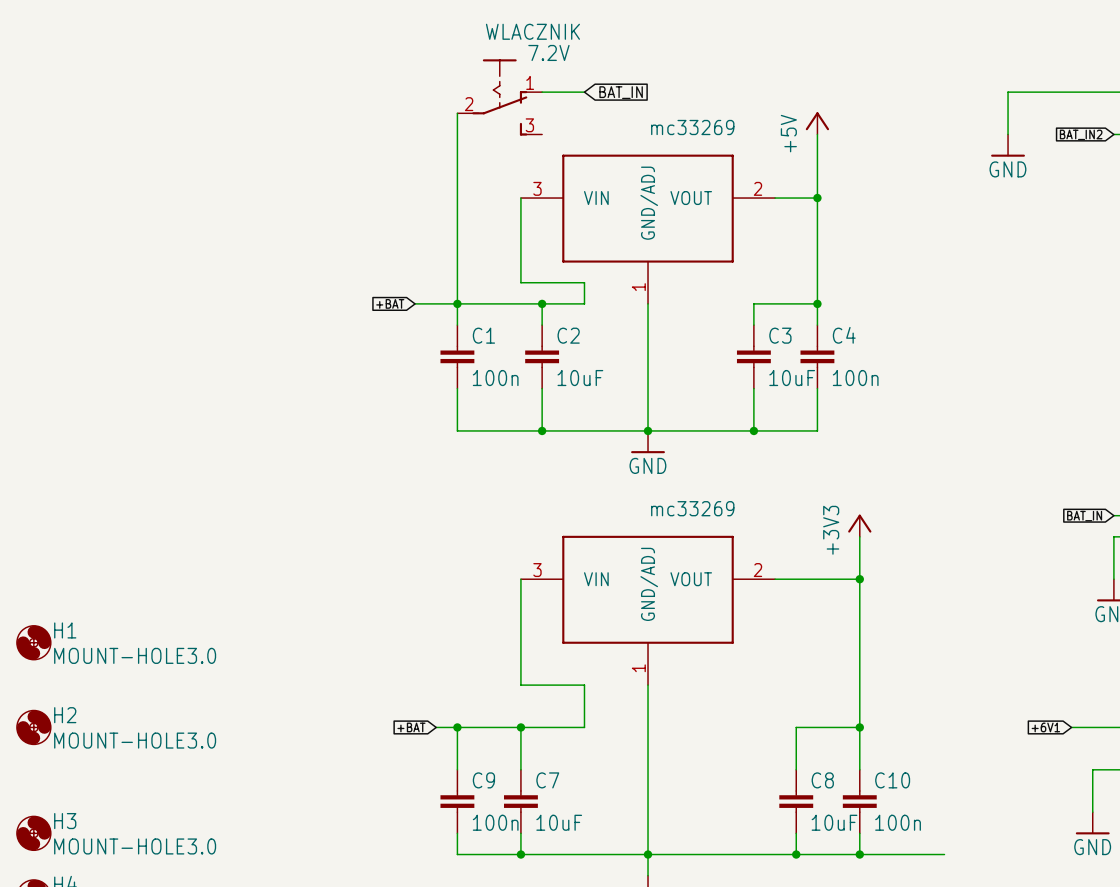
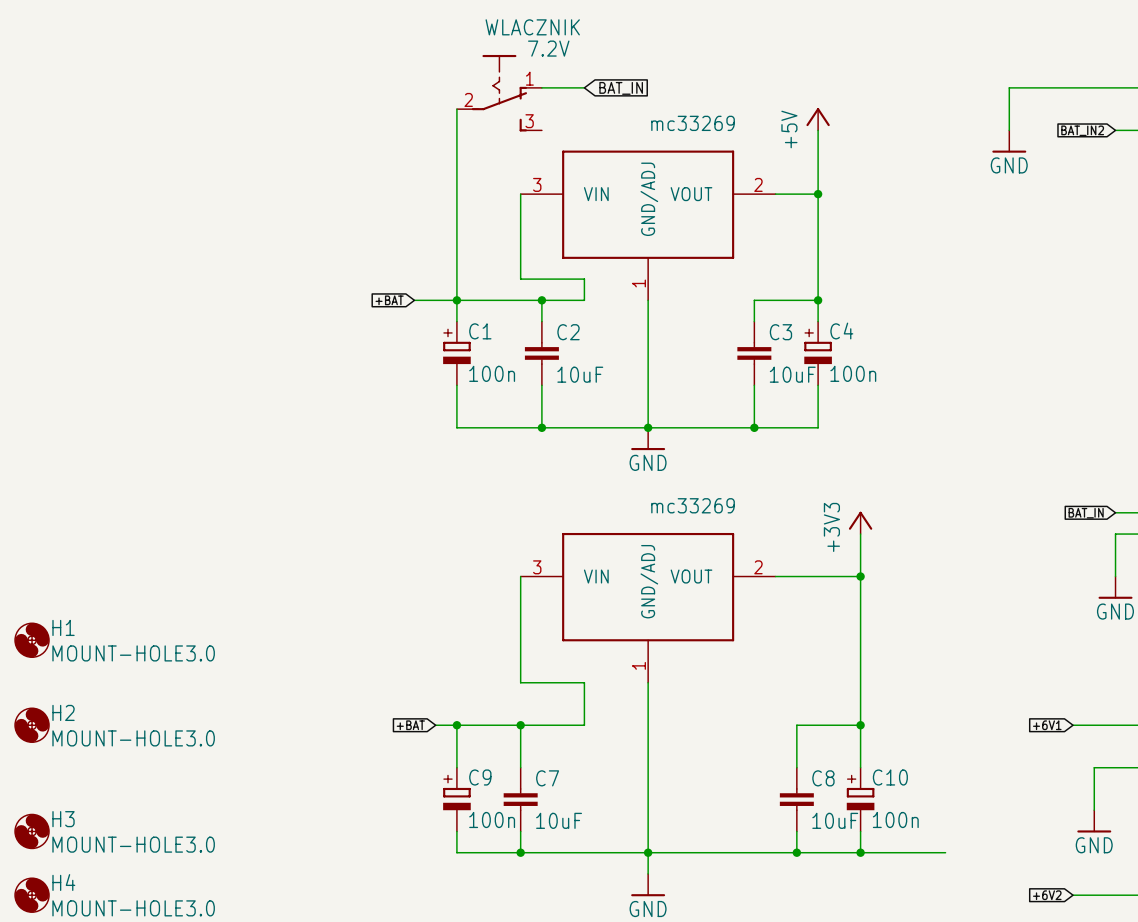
C1 symbol: [440, 325, 475, 389] -> [443, 321, 471, 386]
C4 symbol: [800, 325, 835, 389] -> [804, 321, 832, 386]
C9 symbol: [440, 769, 475, 834] -> [443, 767, 471, 832]
C10 symbol: [842, 769, 877, 834] -> [846, 767, 875, 832]

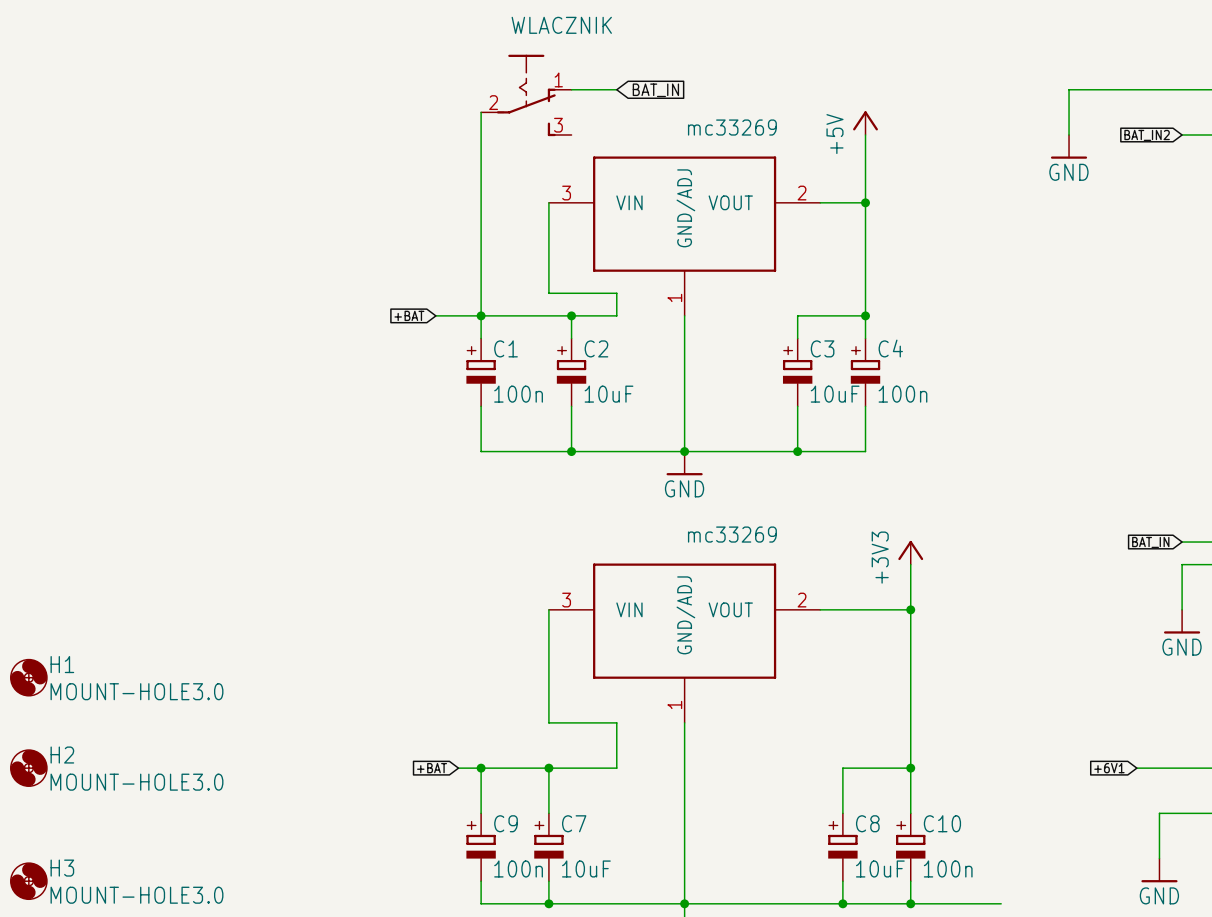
WLACZNIK value: 7.2V (548, 48) -> none
C2 symbol: [524, 321, 559, 386] -> [556, 338, 587, 407]
C3 symbol: [737, 321, 772, 386] -> [782, 338, 813, 407]
C7 symbol: [503, 767, 538, 832] -> [534, 813, 564, 882]
C8 symbol: [779, 767, 814, 832] -> [828, 813, 858, 882]

